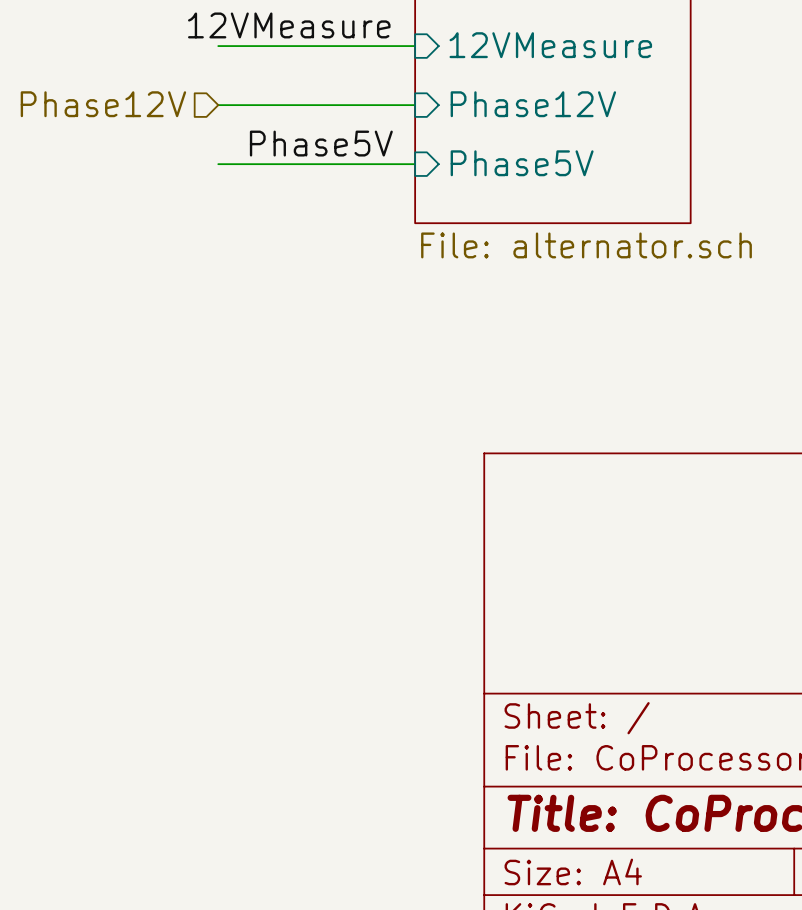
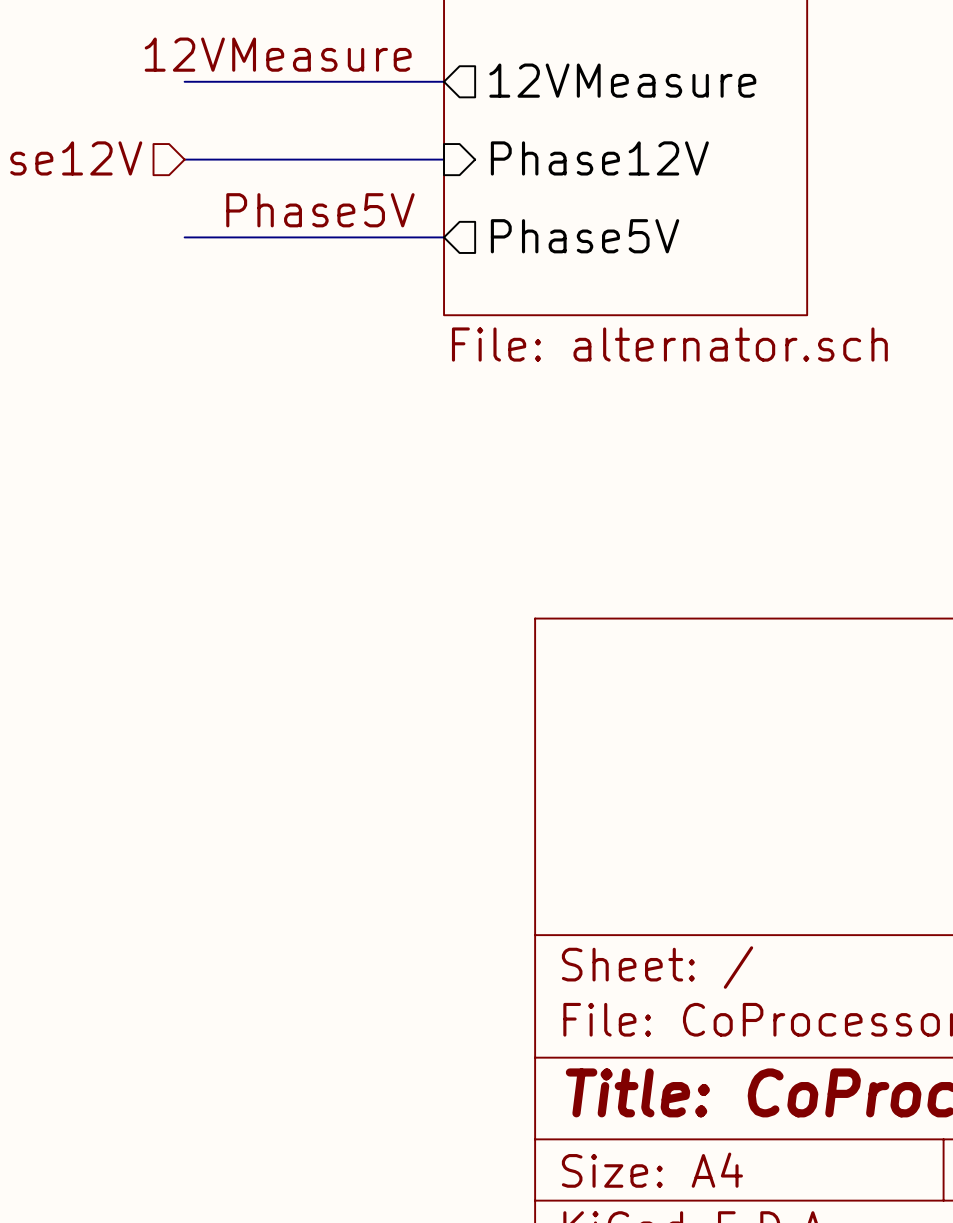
sheet pin shape: input (550, 45) -> output (622, 80)
sheet pin shape: input (522, 163) -> output (585, 236)

